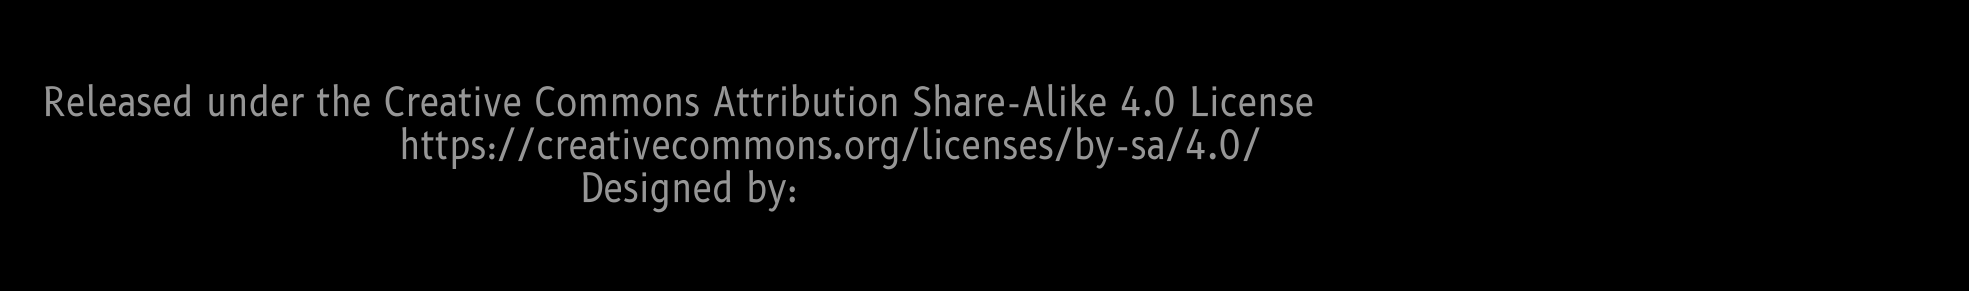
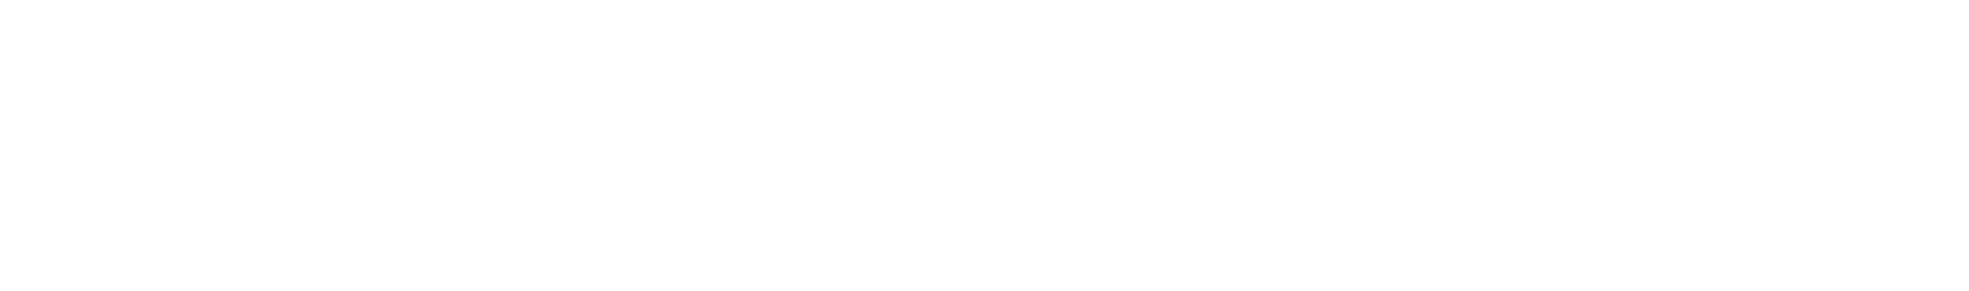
drawing: [45, 84, 1313, 213] -> none

